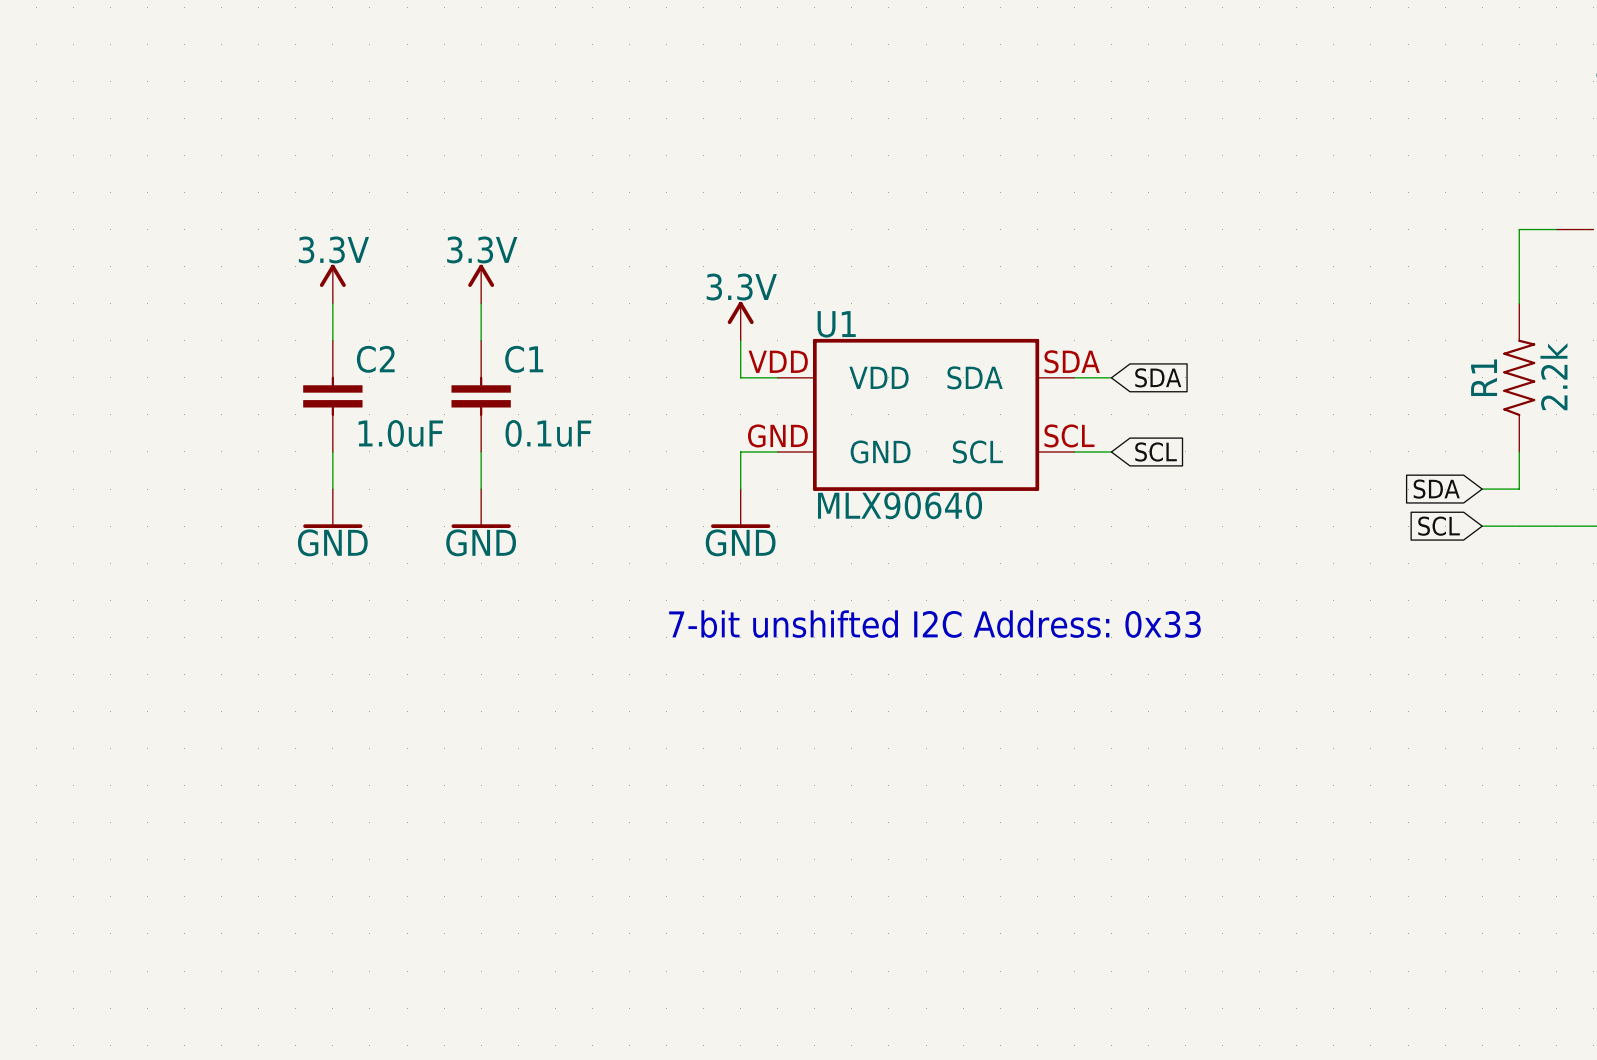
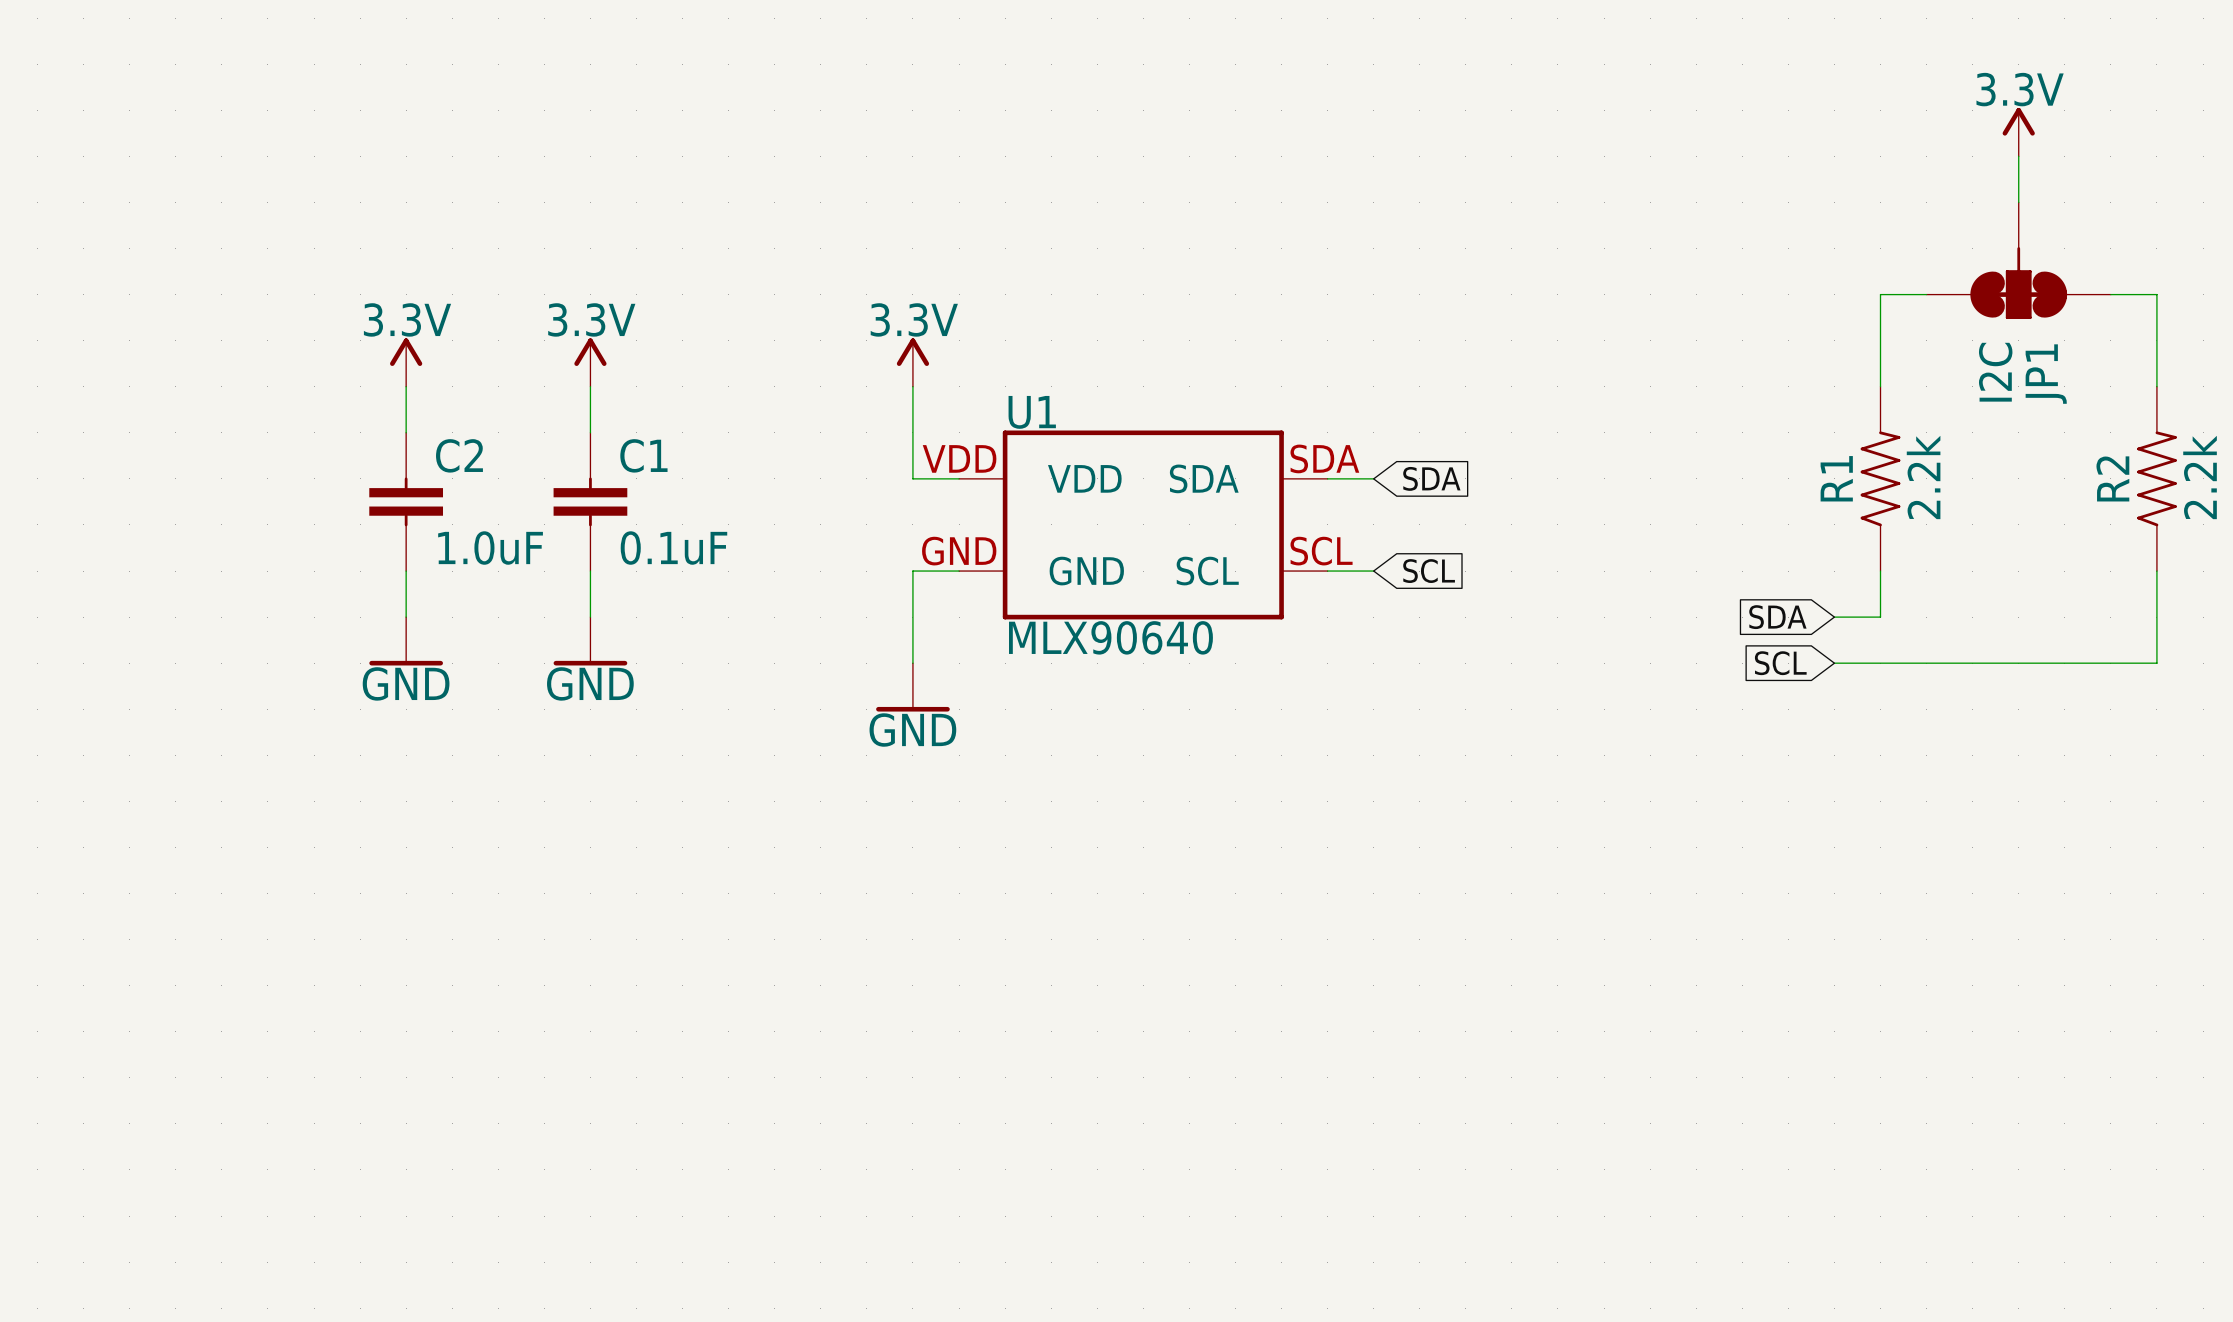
power symbol position: 3.3V (740, 321) -> 3.3V (912, 362)
power symbol position: GND (740, 508) -> GND (912, 687)
text: 7-bit unshifted I2C Address: 0x33 (934, 624) -> none

